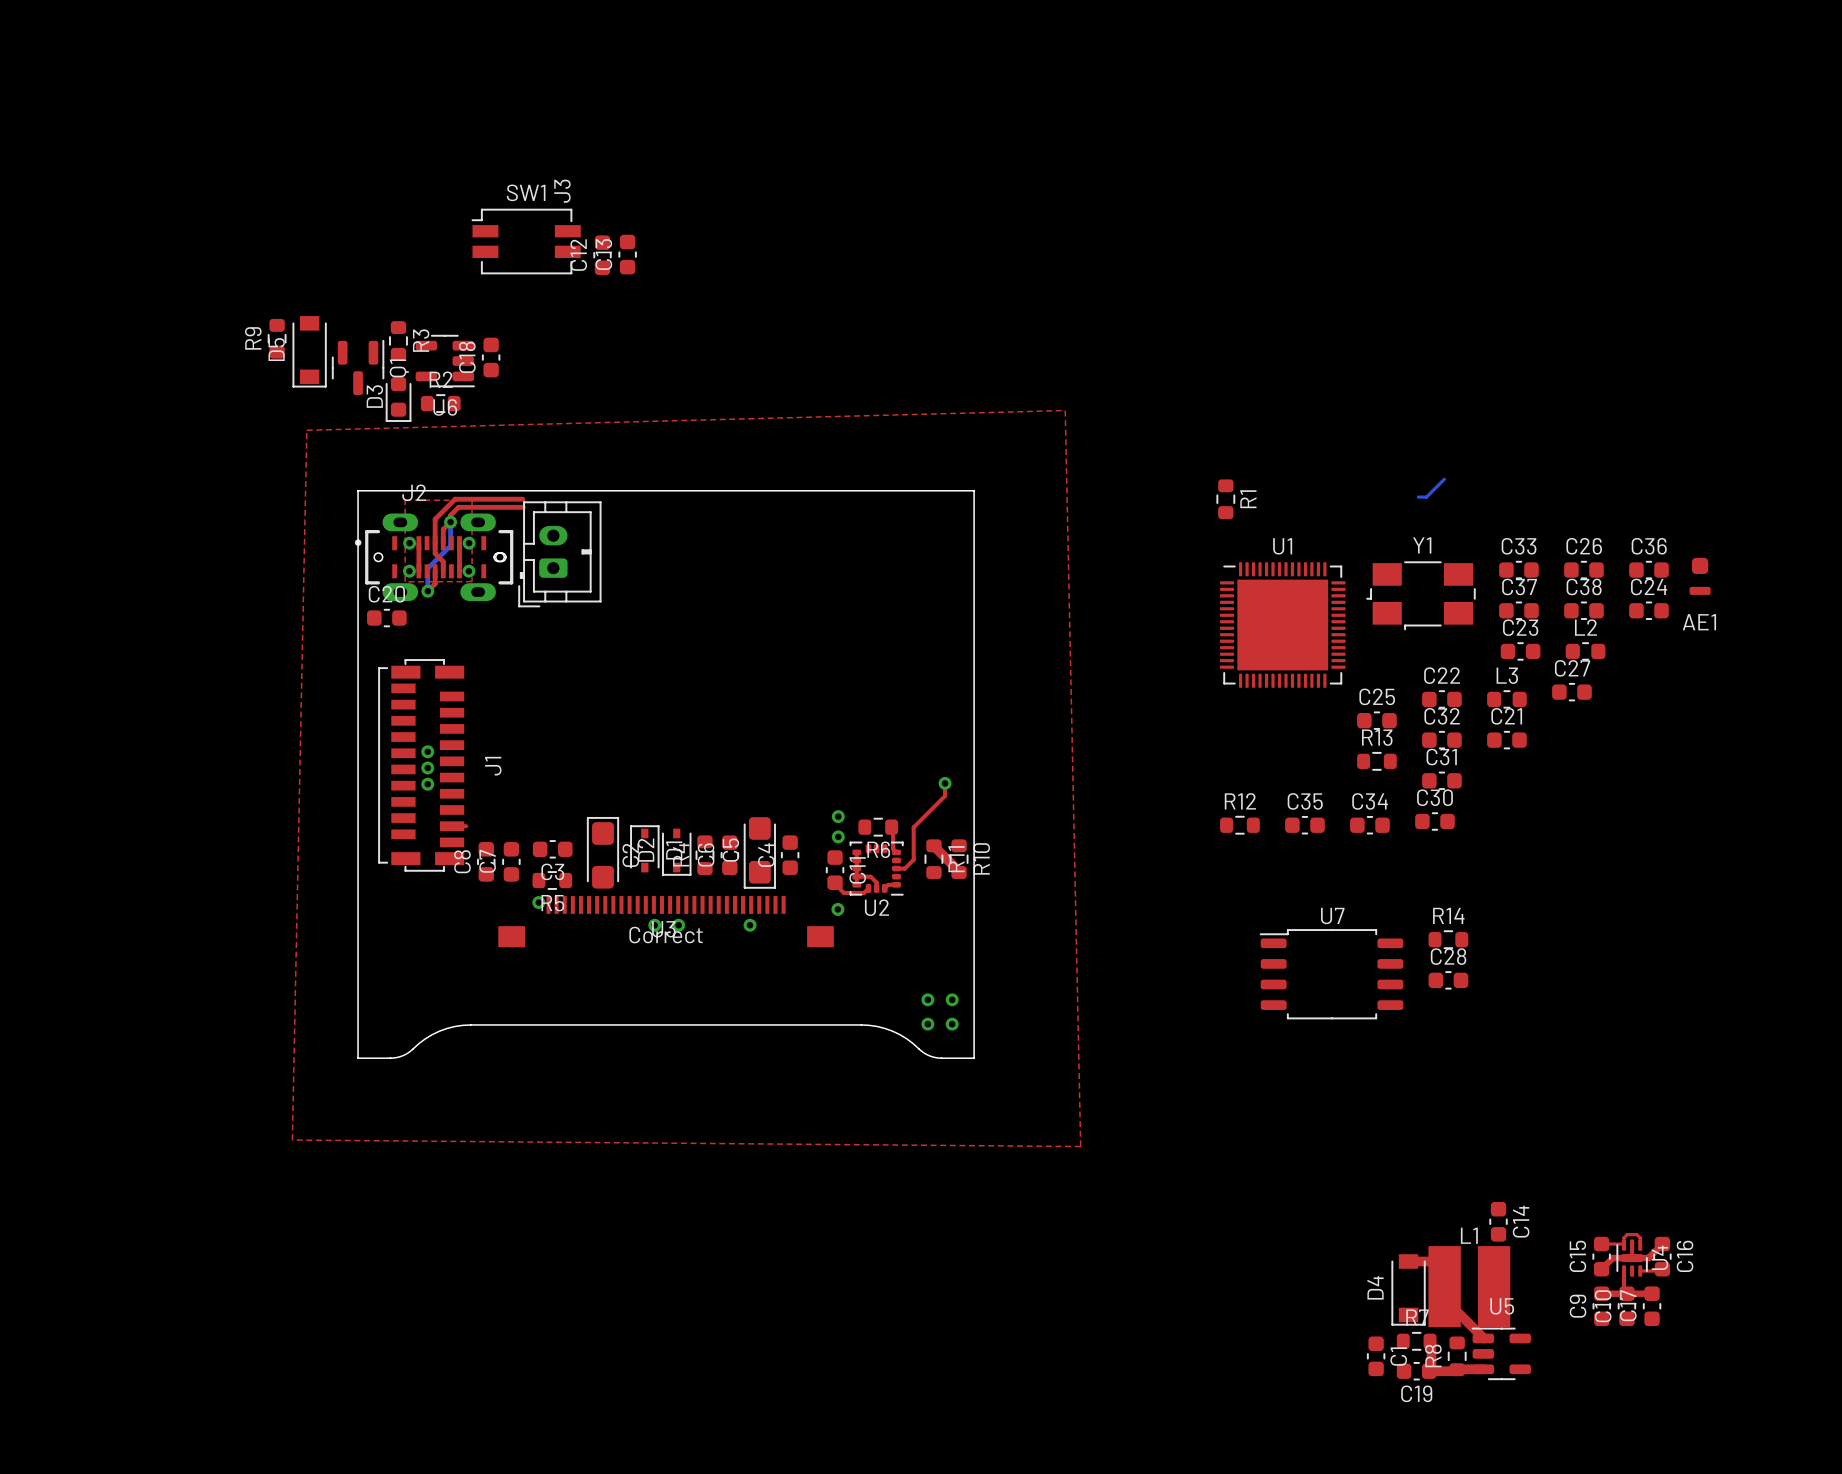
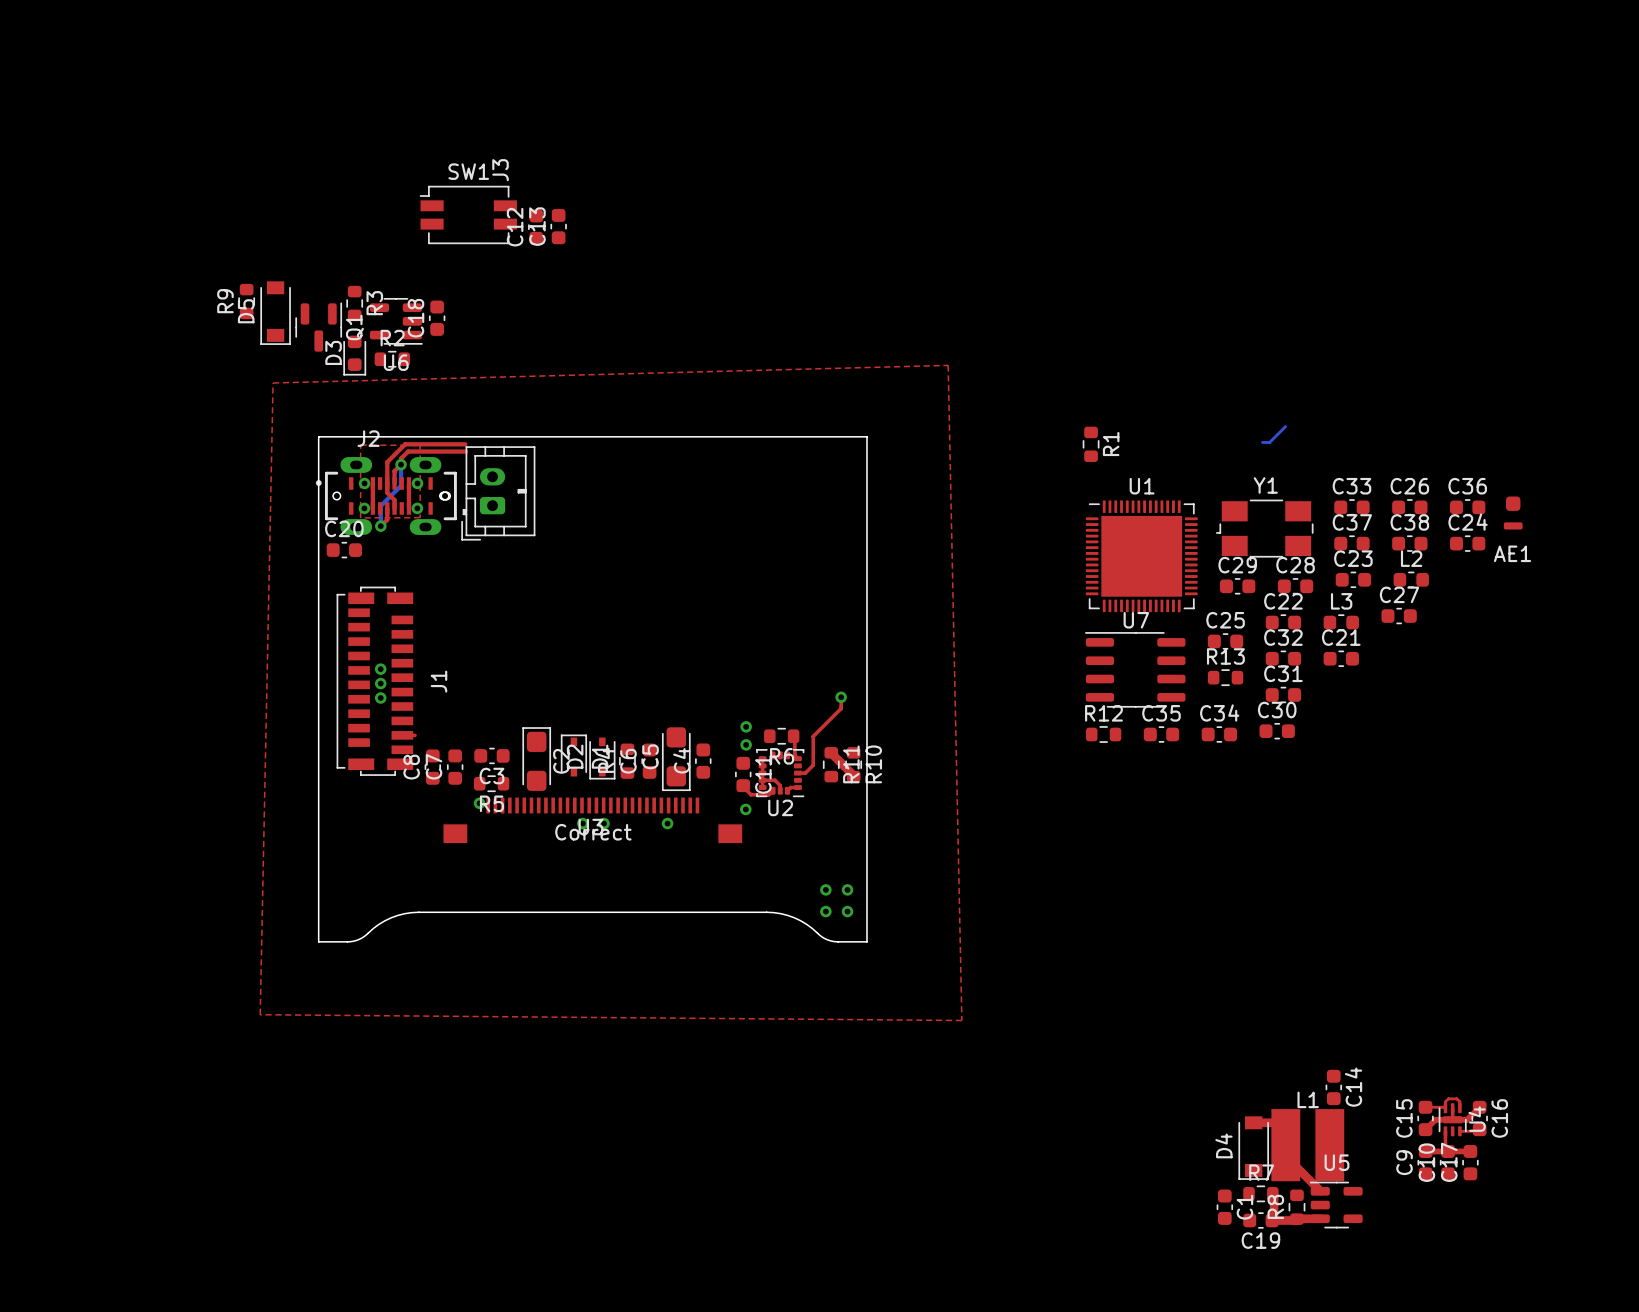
C29: none -> (1237, 586)
U7 footprint: [1259, 929, 1404, 1020] -> [1085, 632, 1186, 708]
R14: (1448, 939) -> none
C28 position: (1448, 980) -> (1295, 586)

